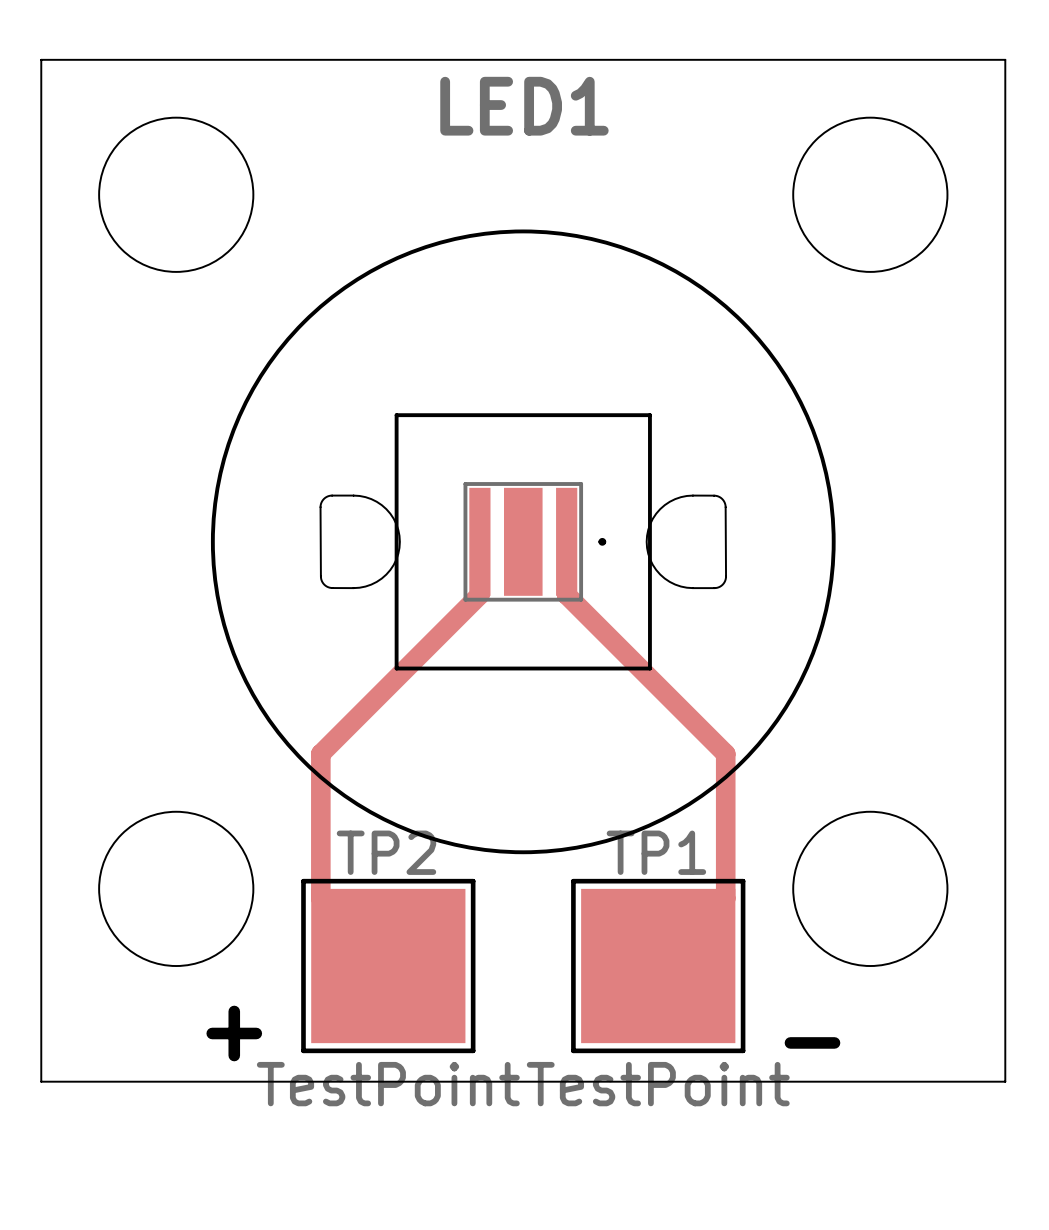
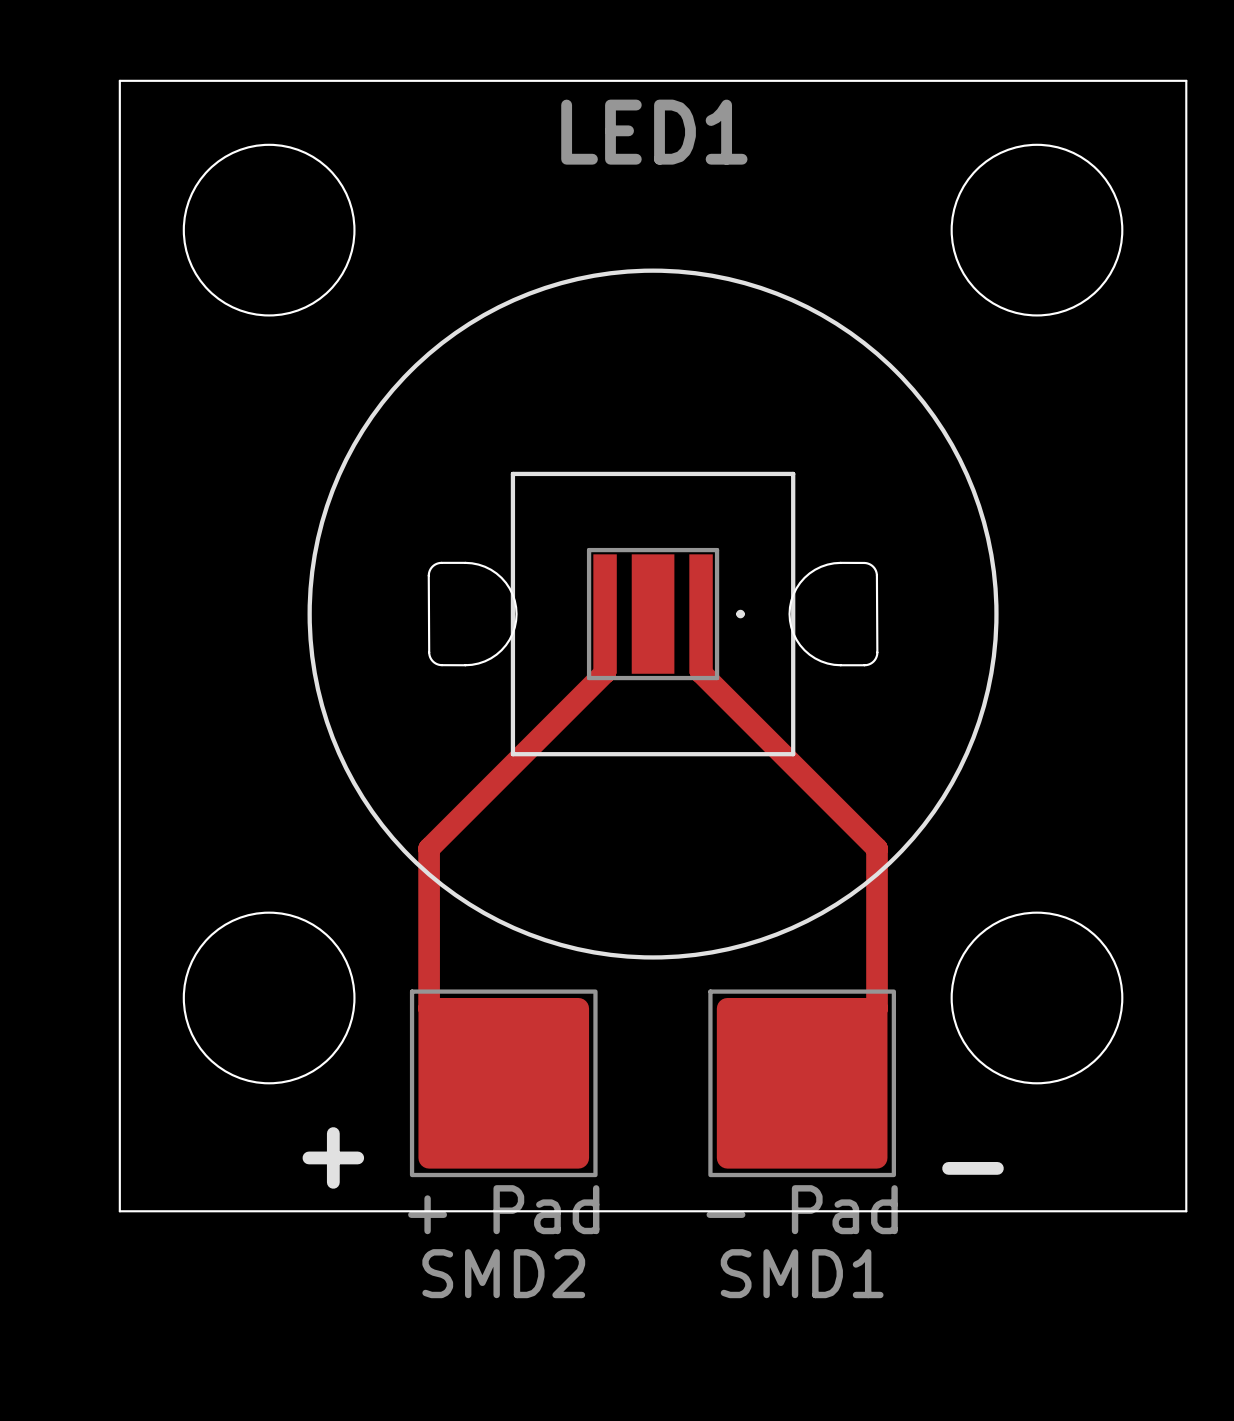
TP2: TestPoint (388, 966) -> none
SMD2: none -> + Pad (503, 1083)
TP1: TestPoint (658, 966) -> none
SMD1: none -> - Pad (802, 1083)

